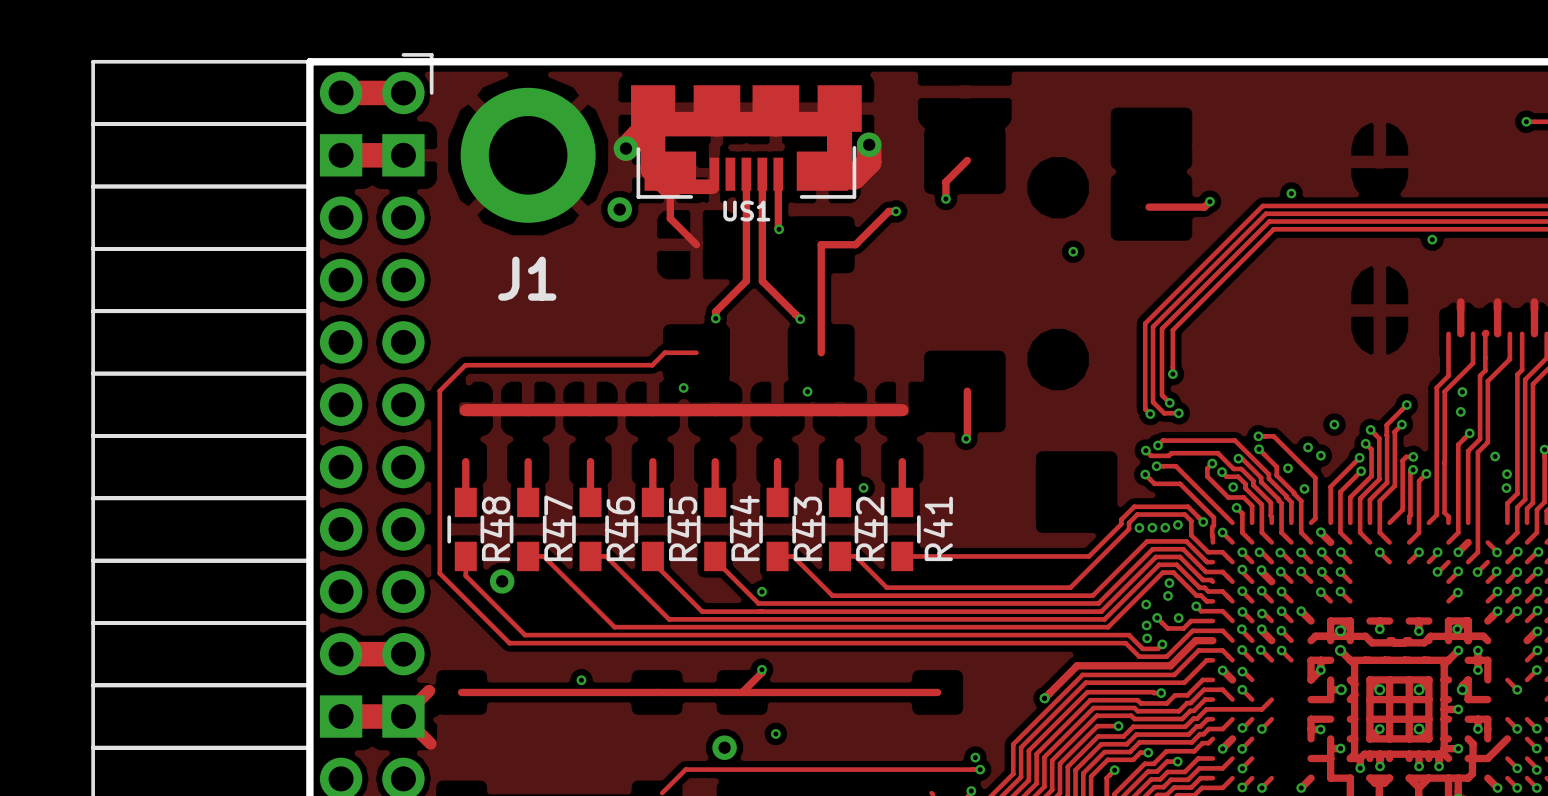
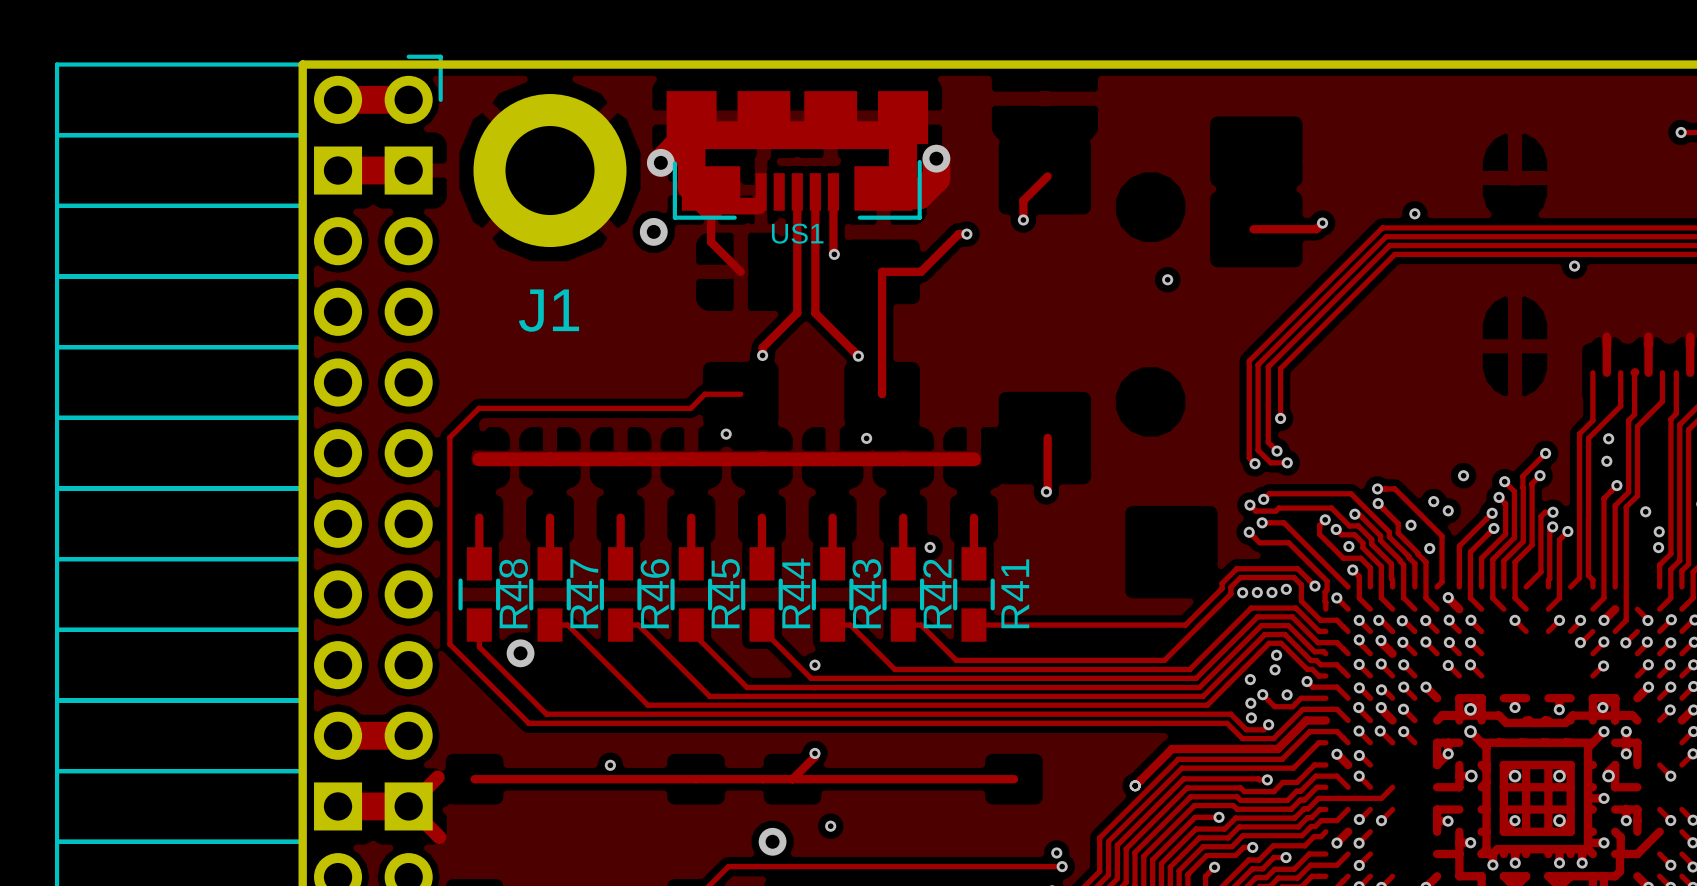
track: none -> (1670, 709) (1659, 720)
via: none -> (1670, 709)

